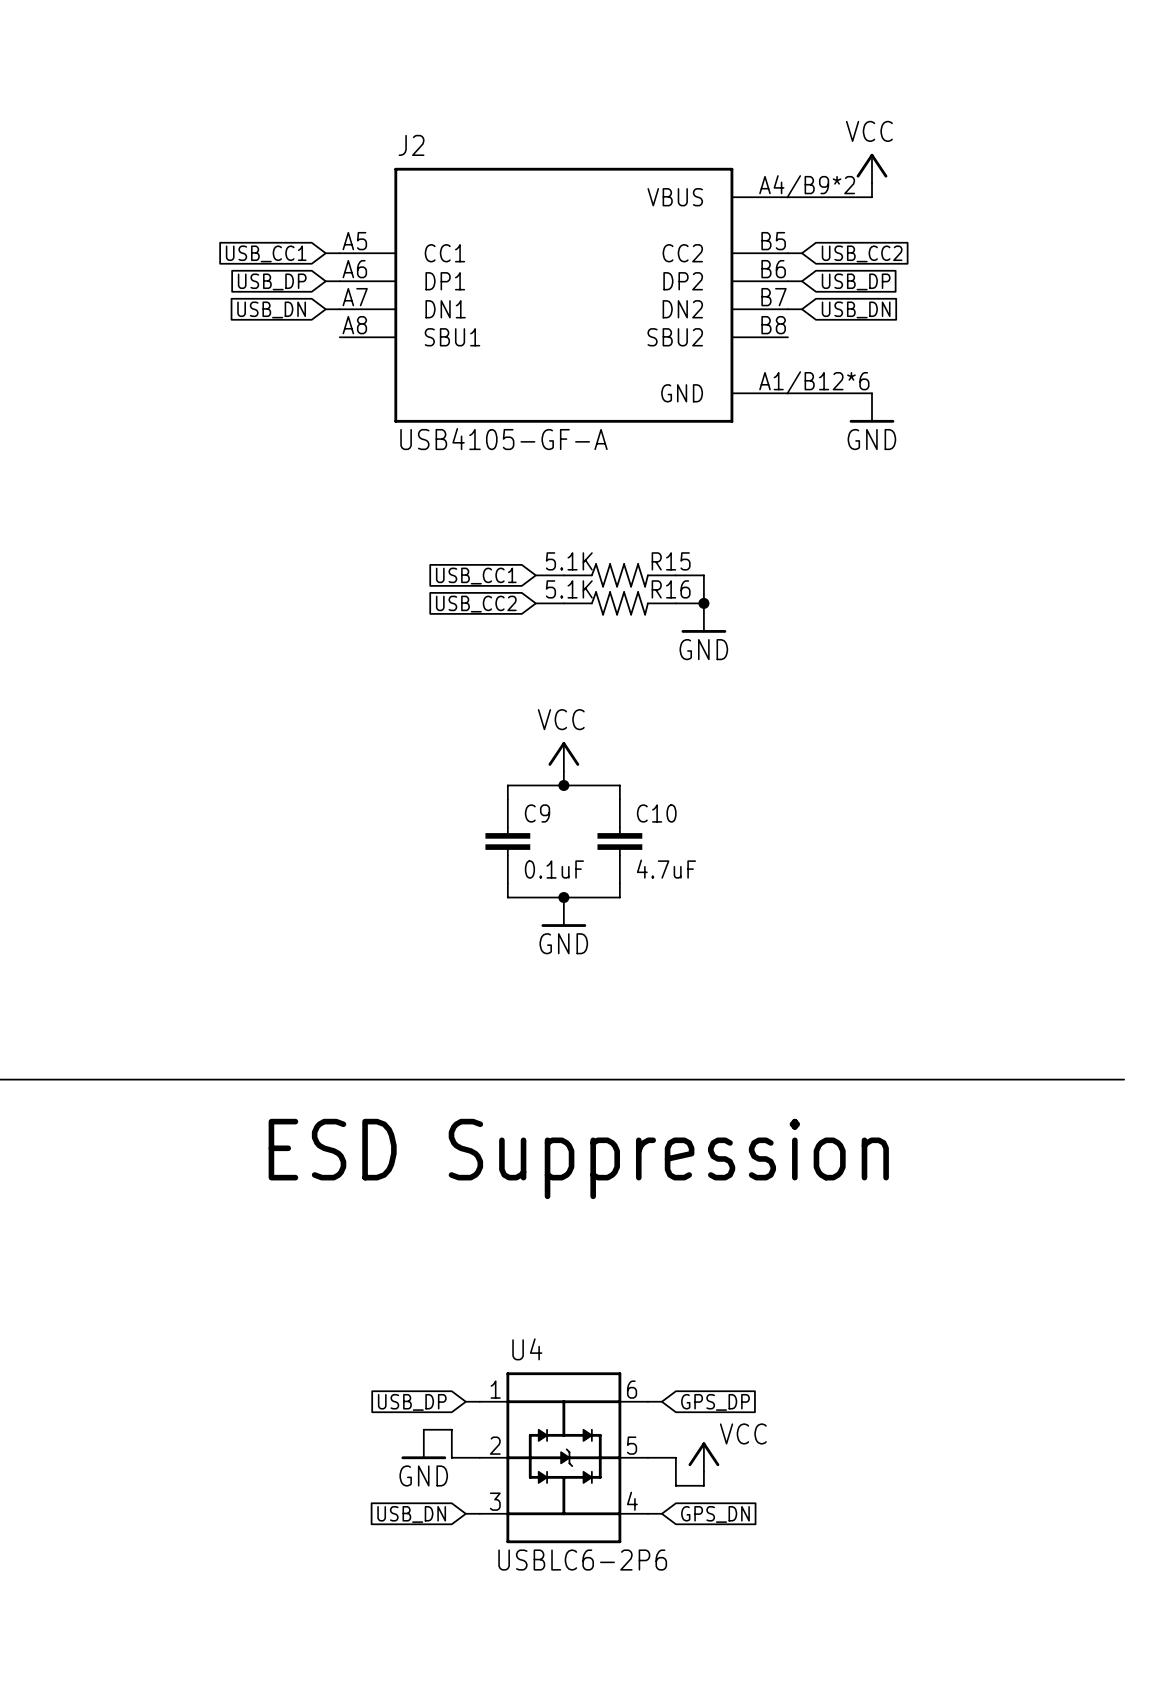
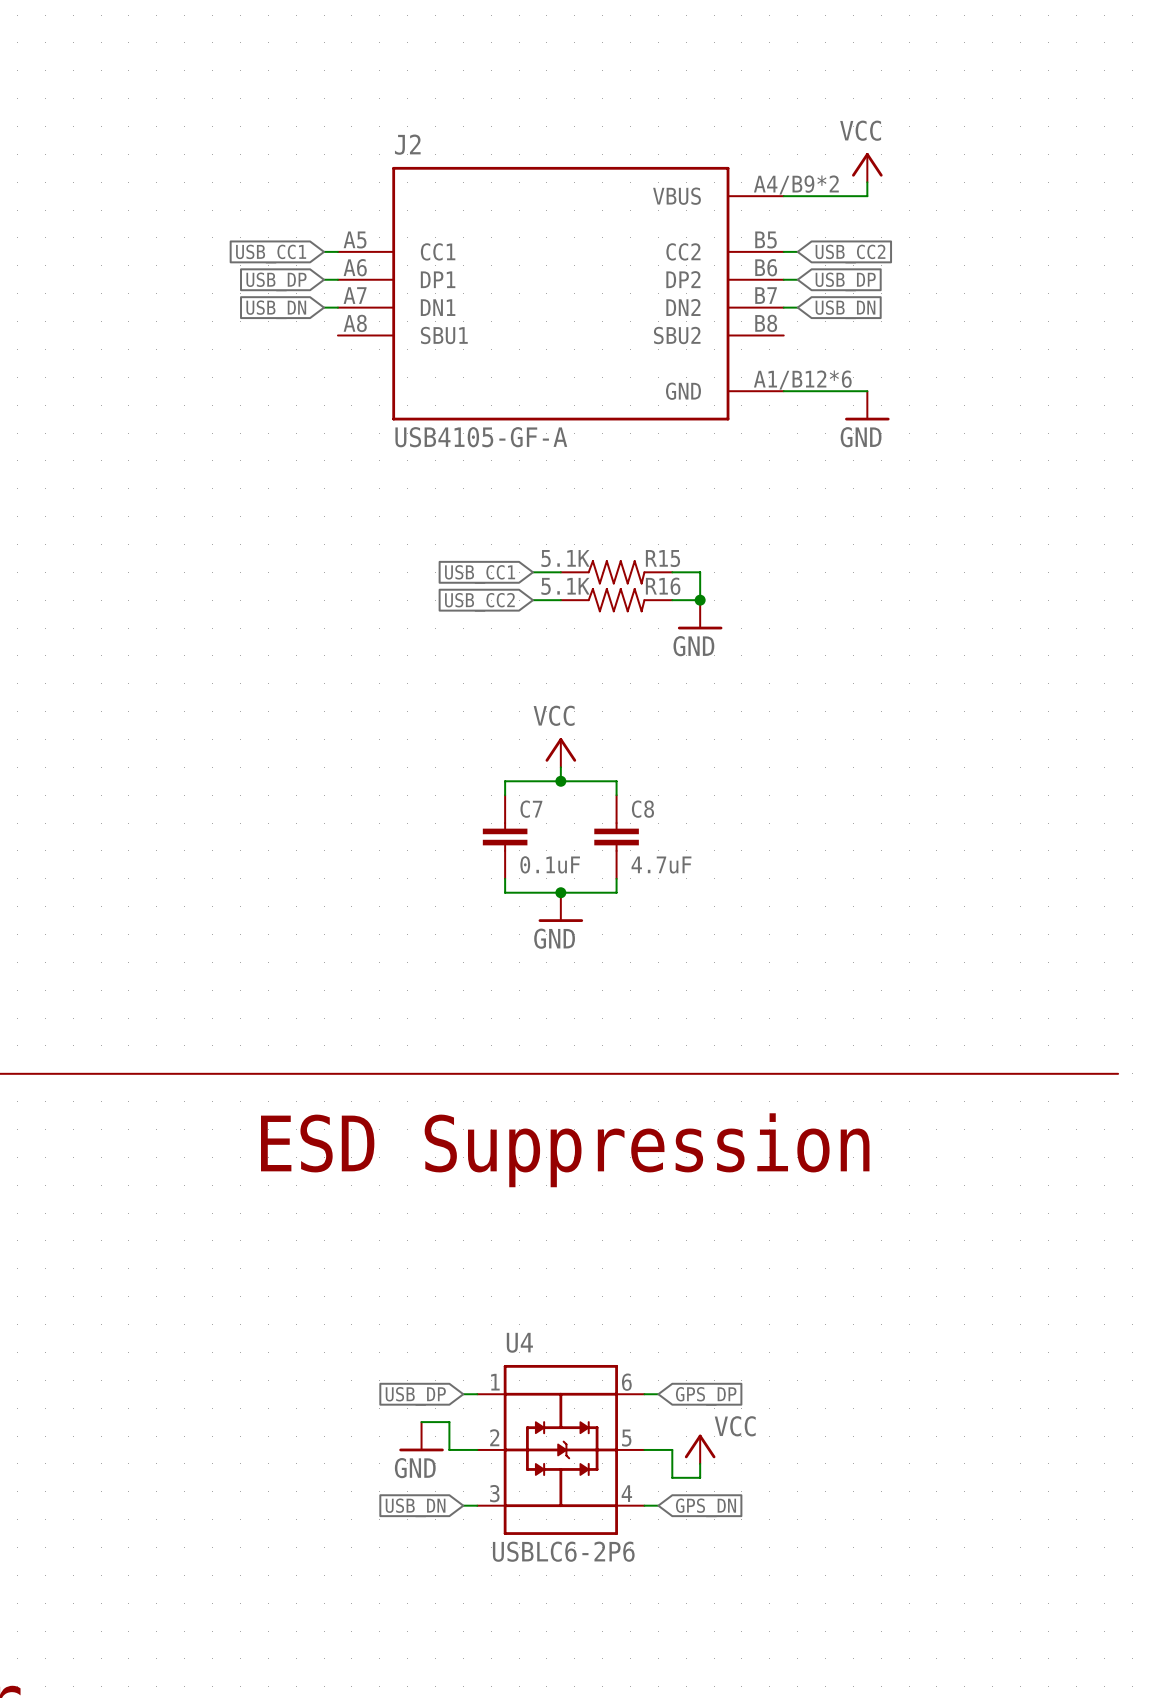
C9 name: C9 (537, 813) -> C7 (531, 809)
C10 name: C10 (656, 813) -> C8 (642, 809)

